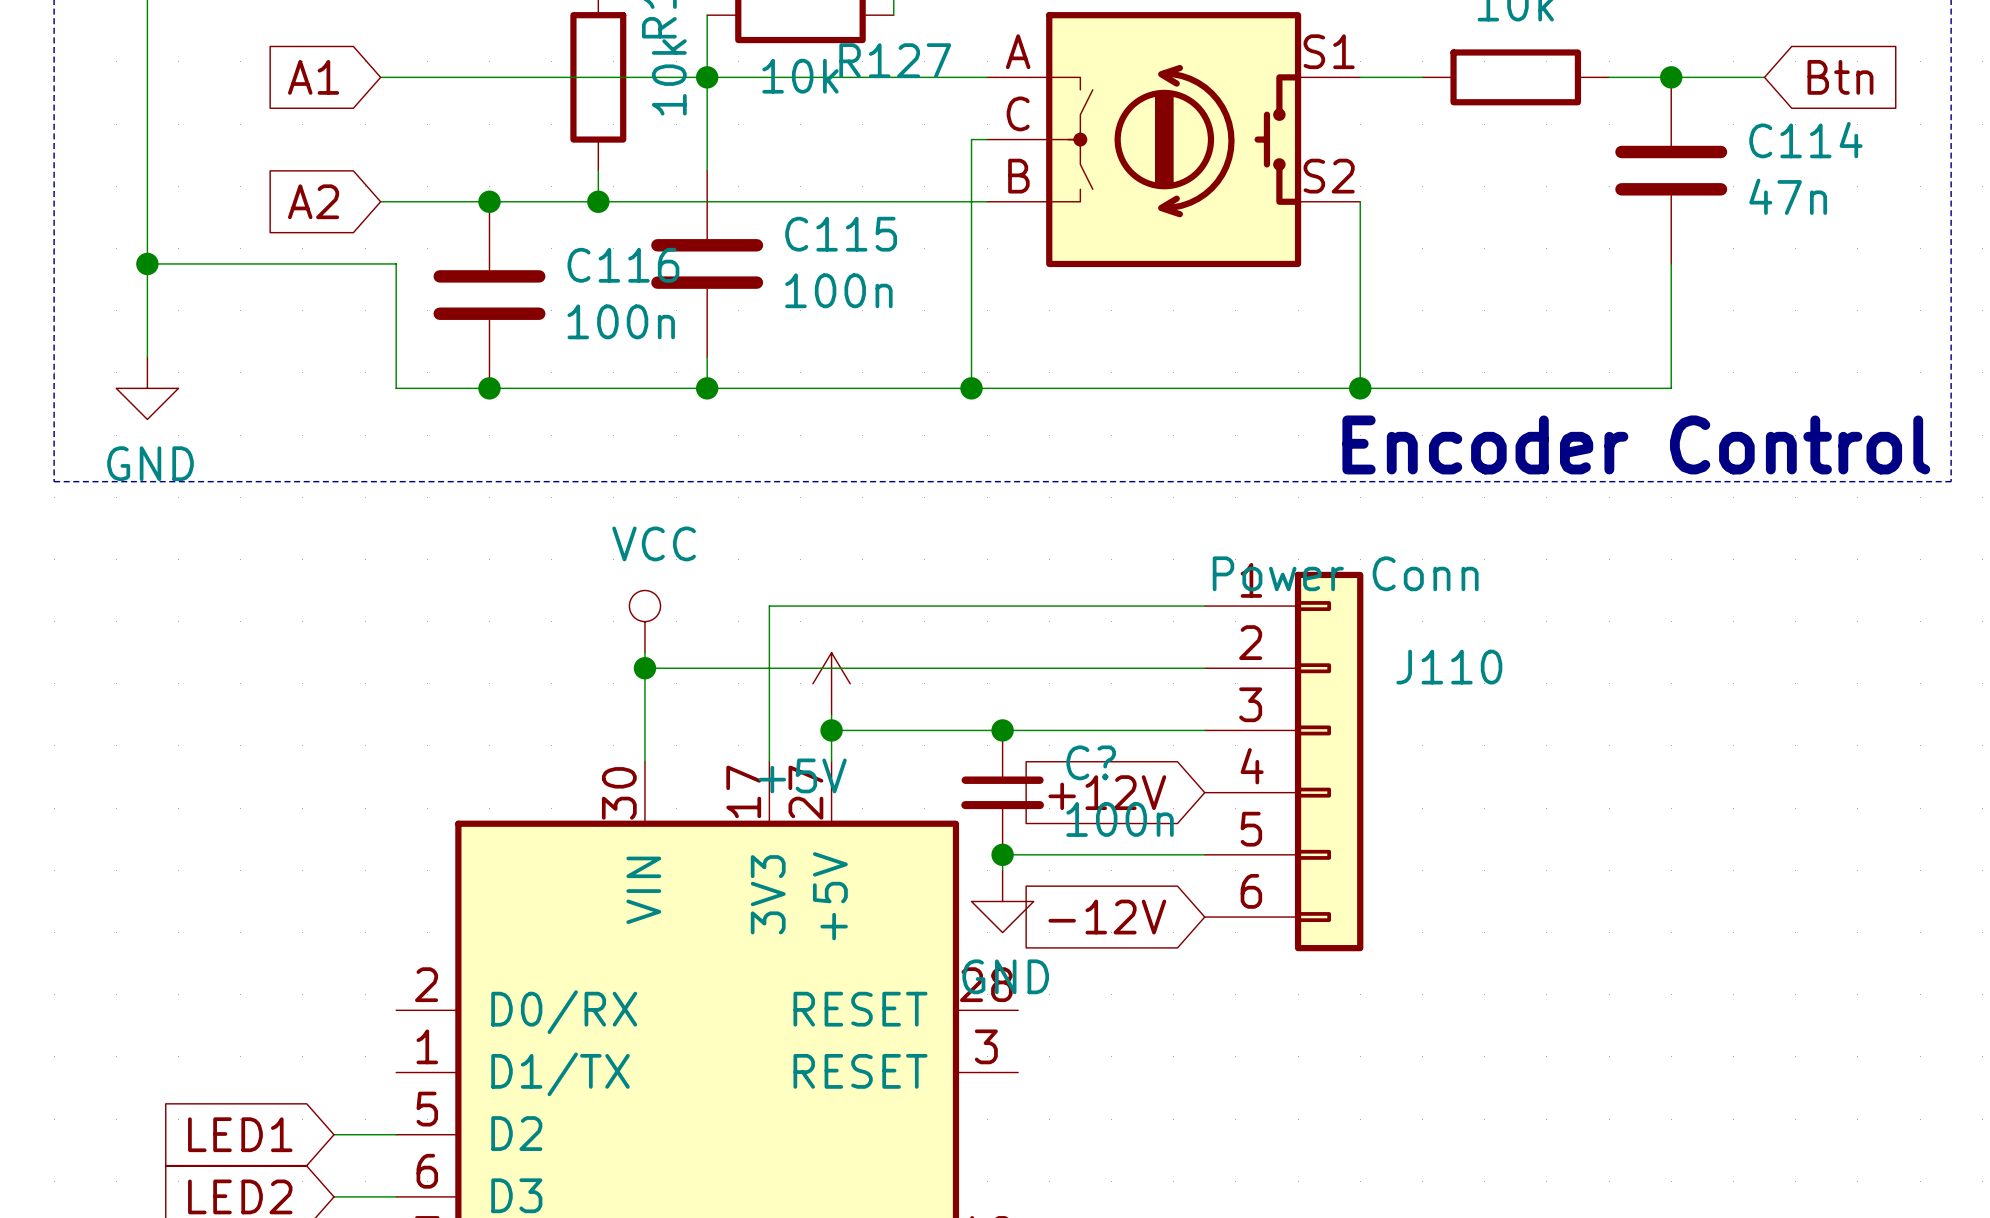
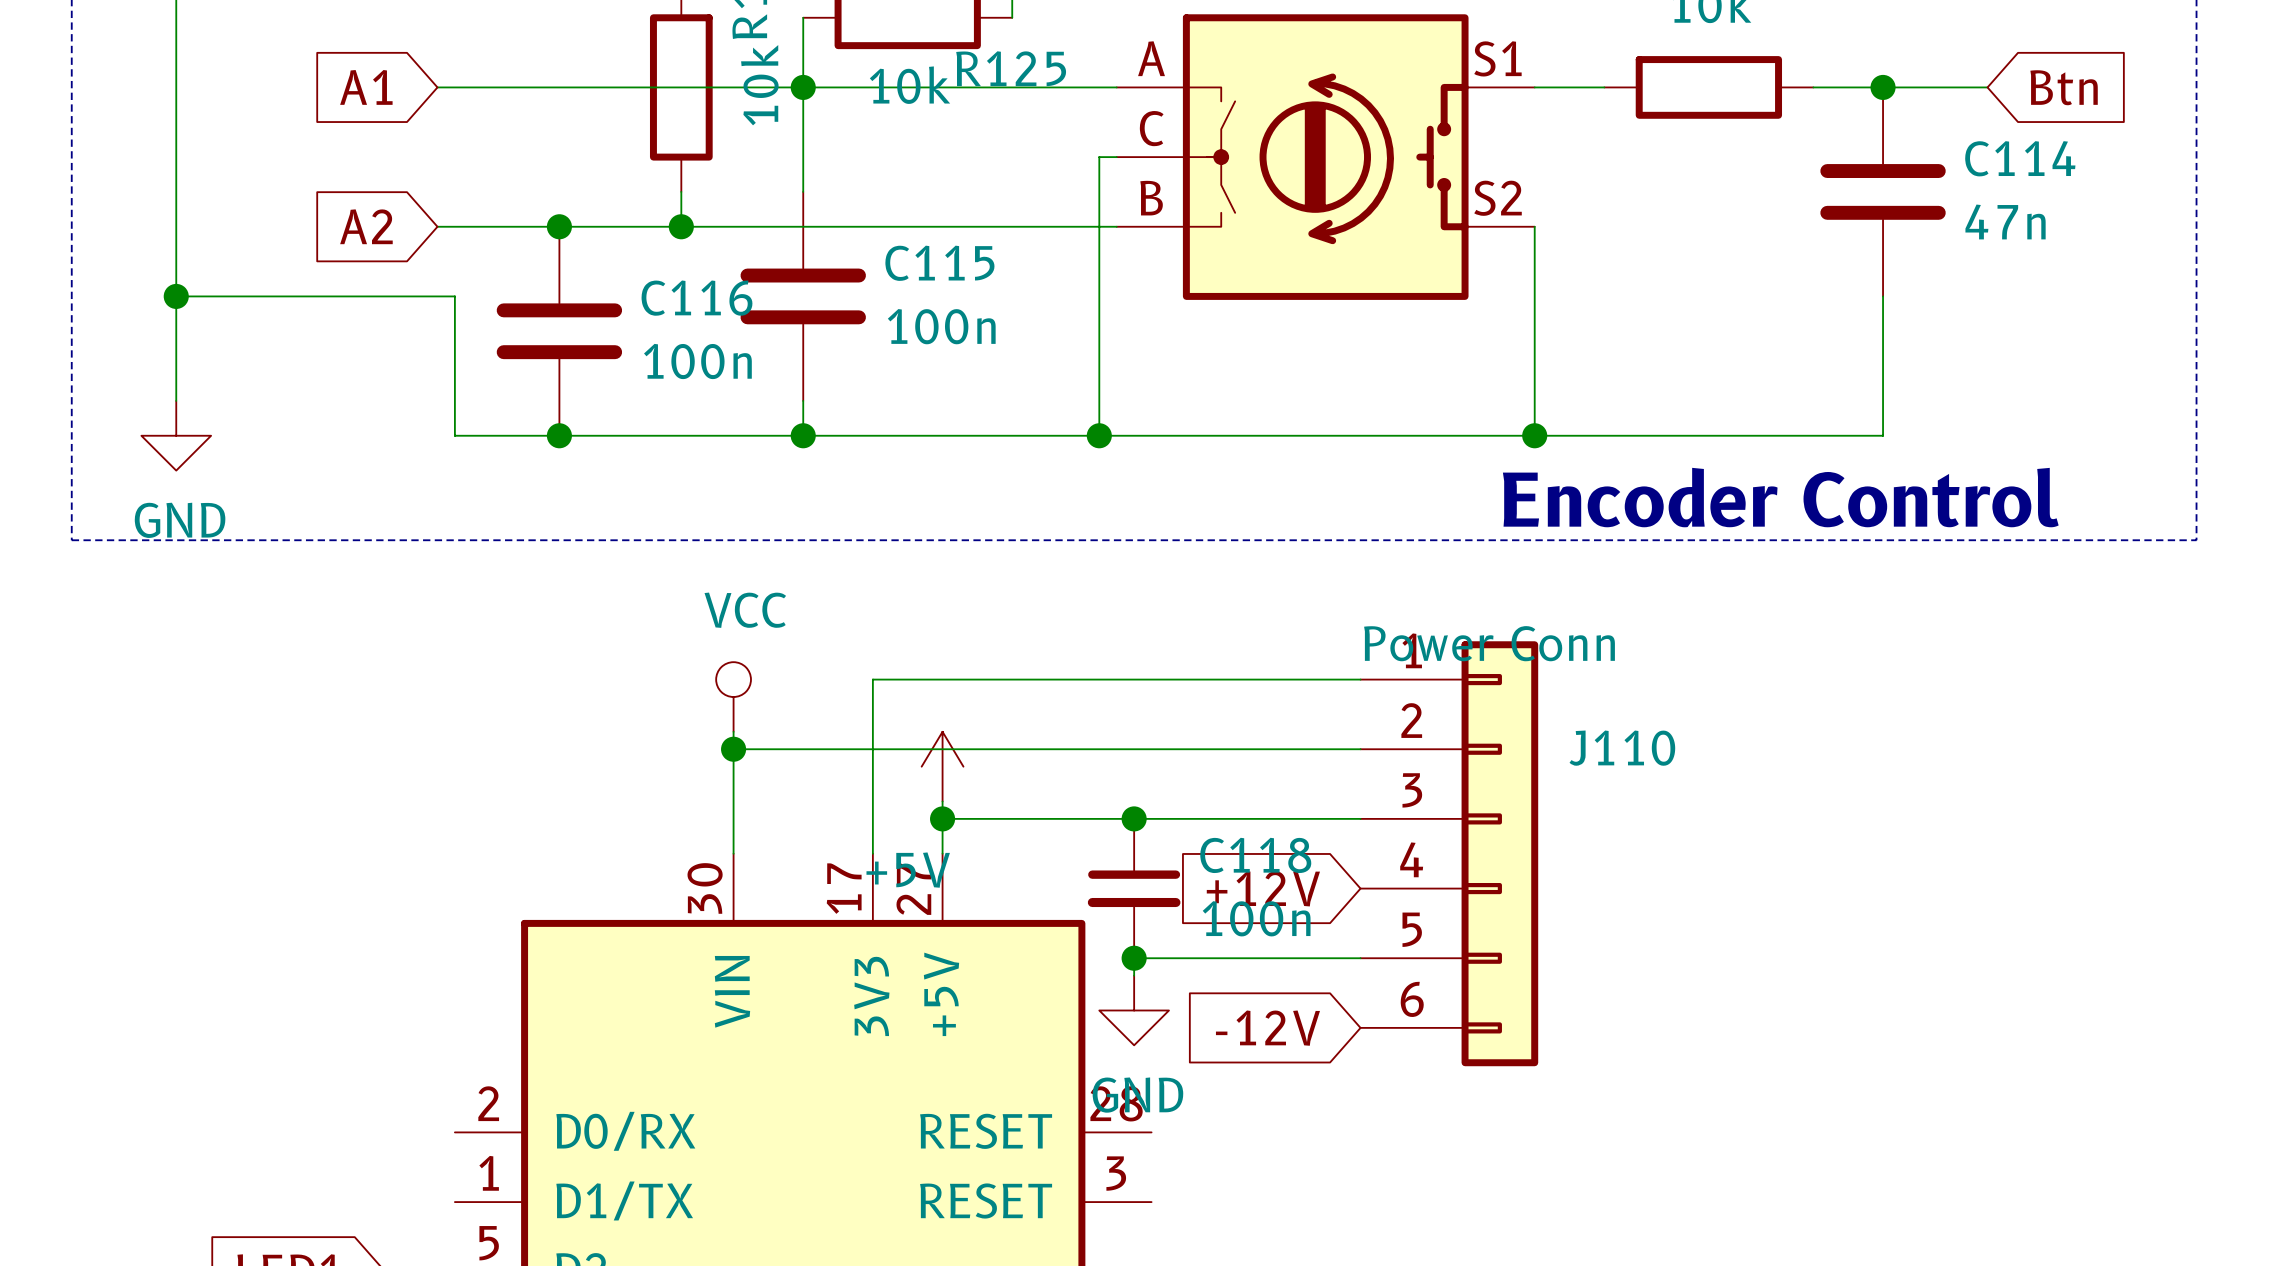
R127 name: R127 (895, 60) -> R125 (1011, 68)
C? name: C? (1091, 762) -> C118 (1255, 855)

